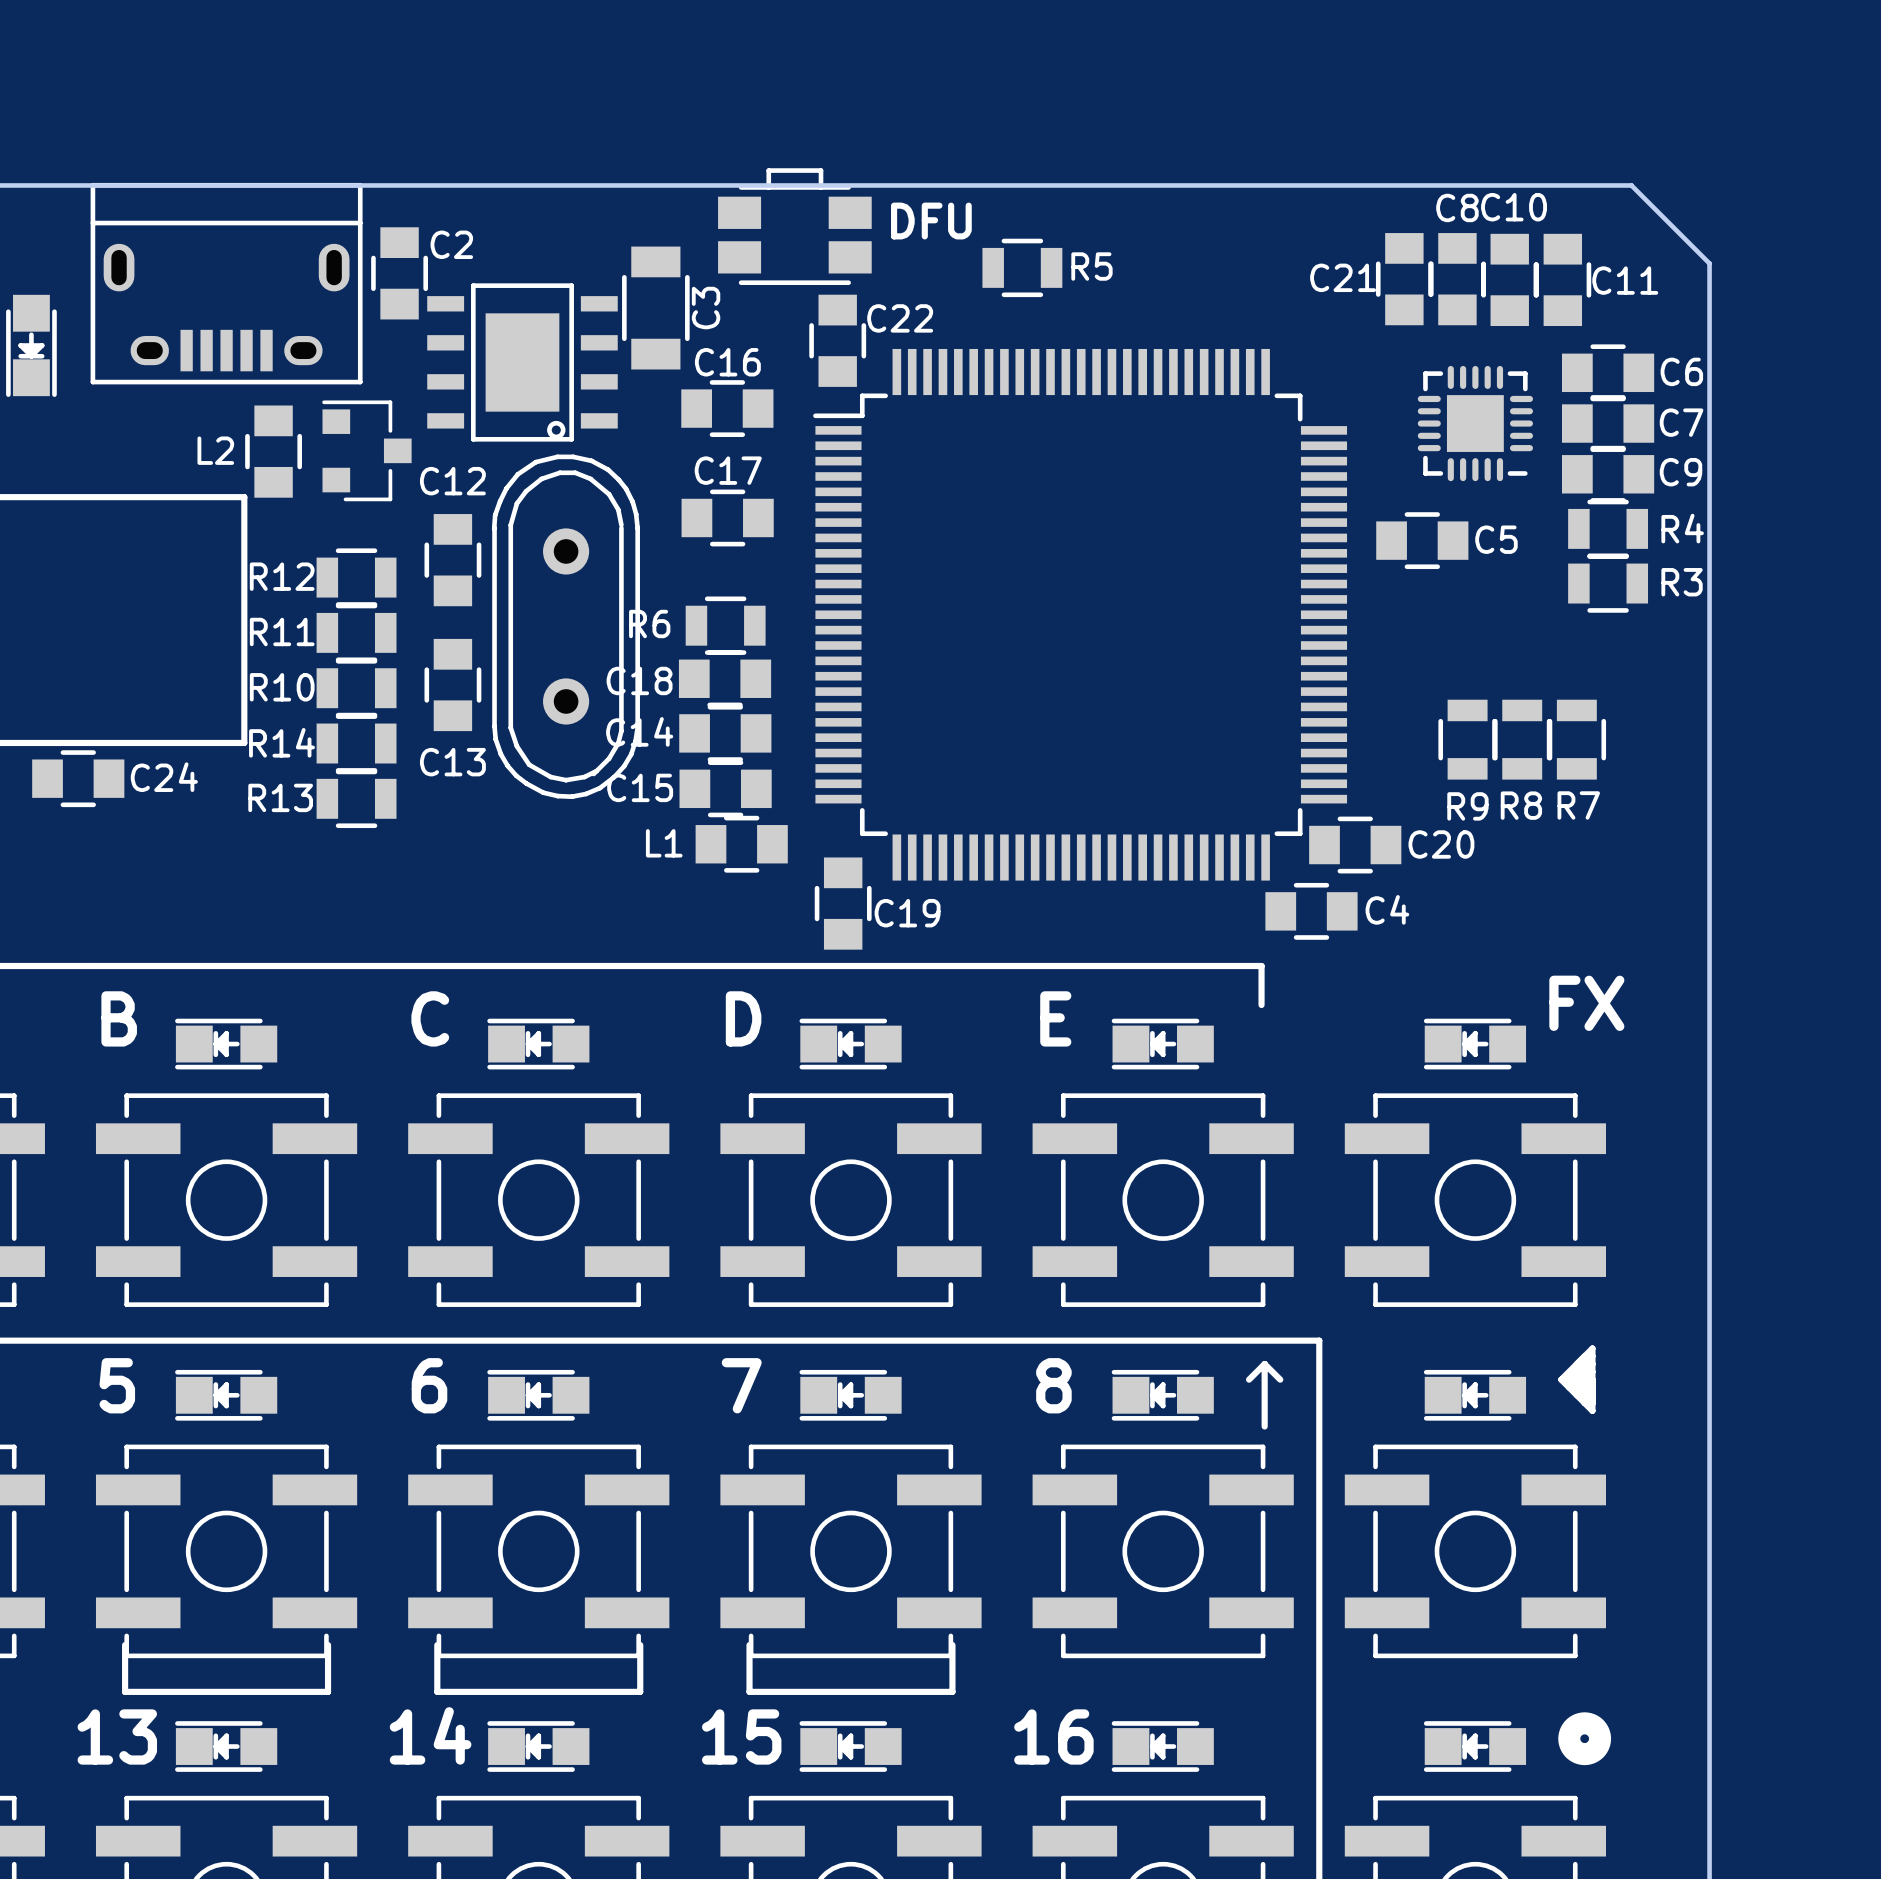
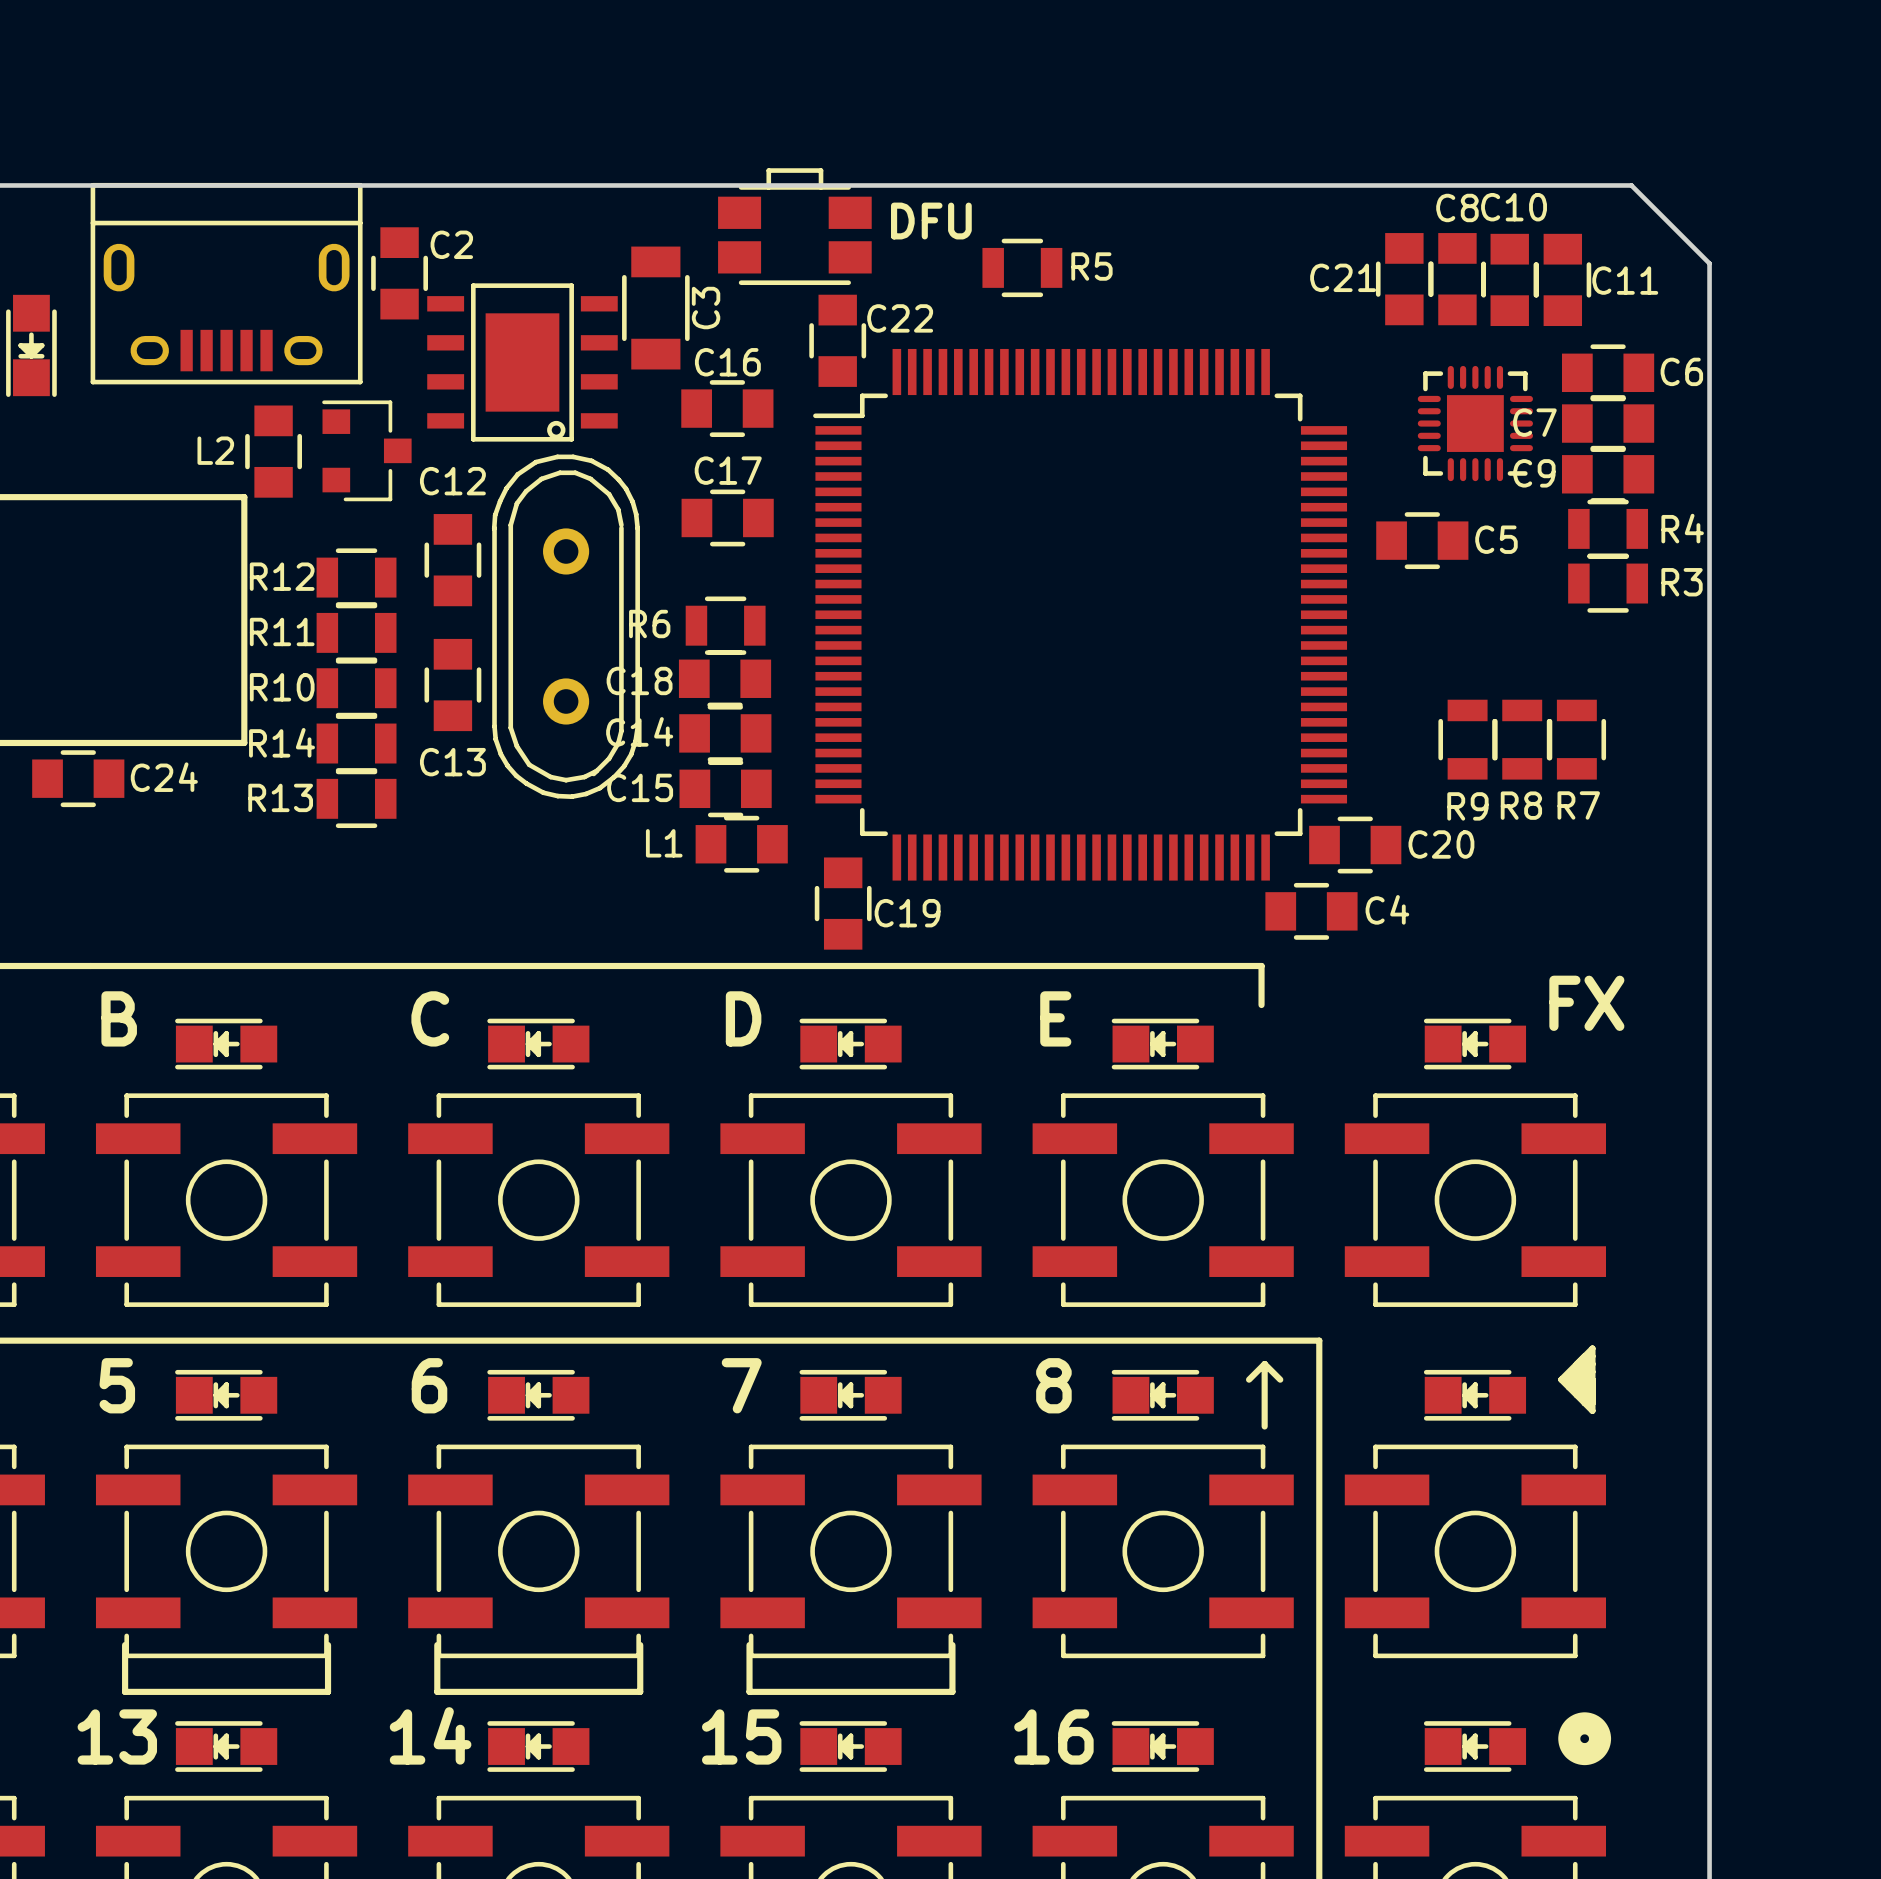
C7 name position: C7 (1681, 422) -> C7 (1534, 422)
C9 name position: C9 (1680, 472) -> C9 (1534, 473)

